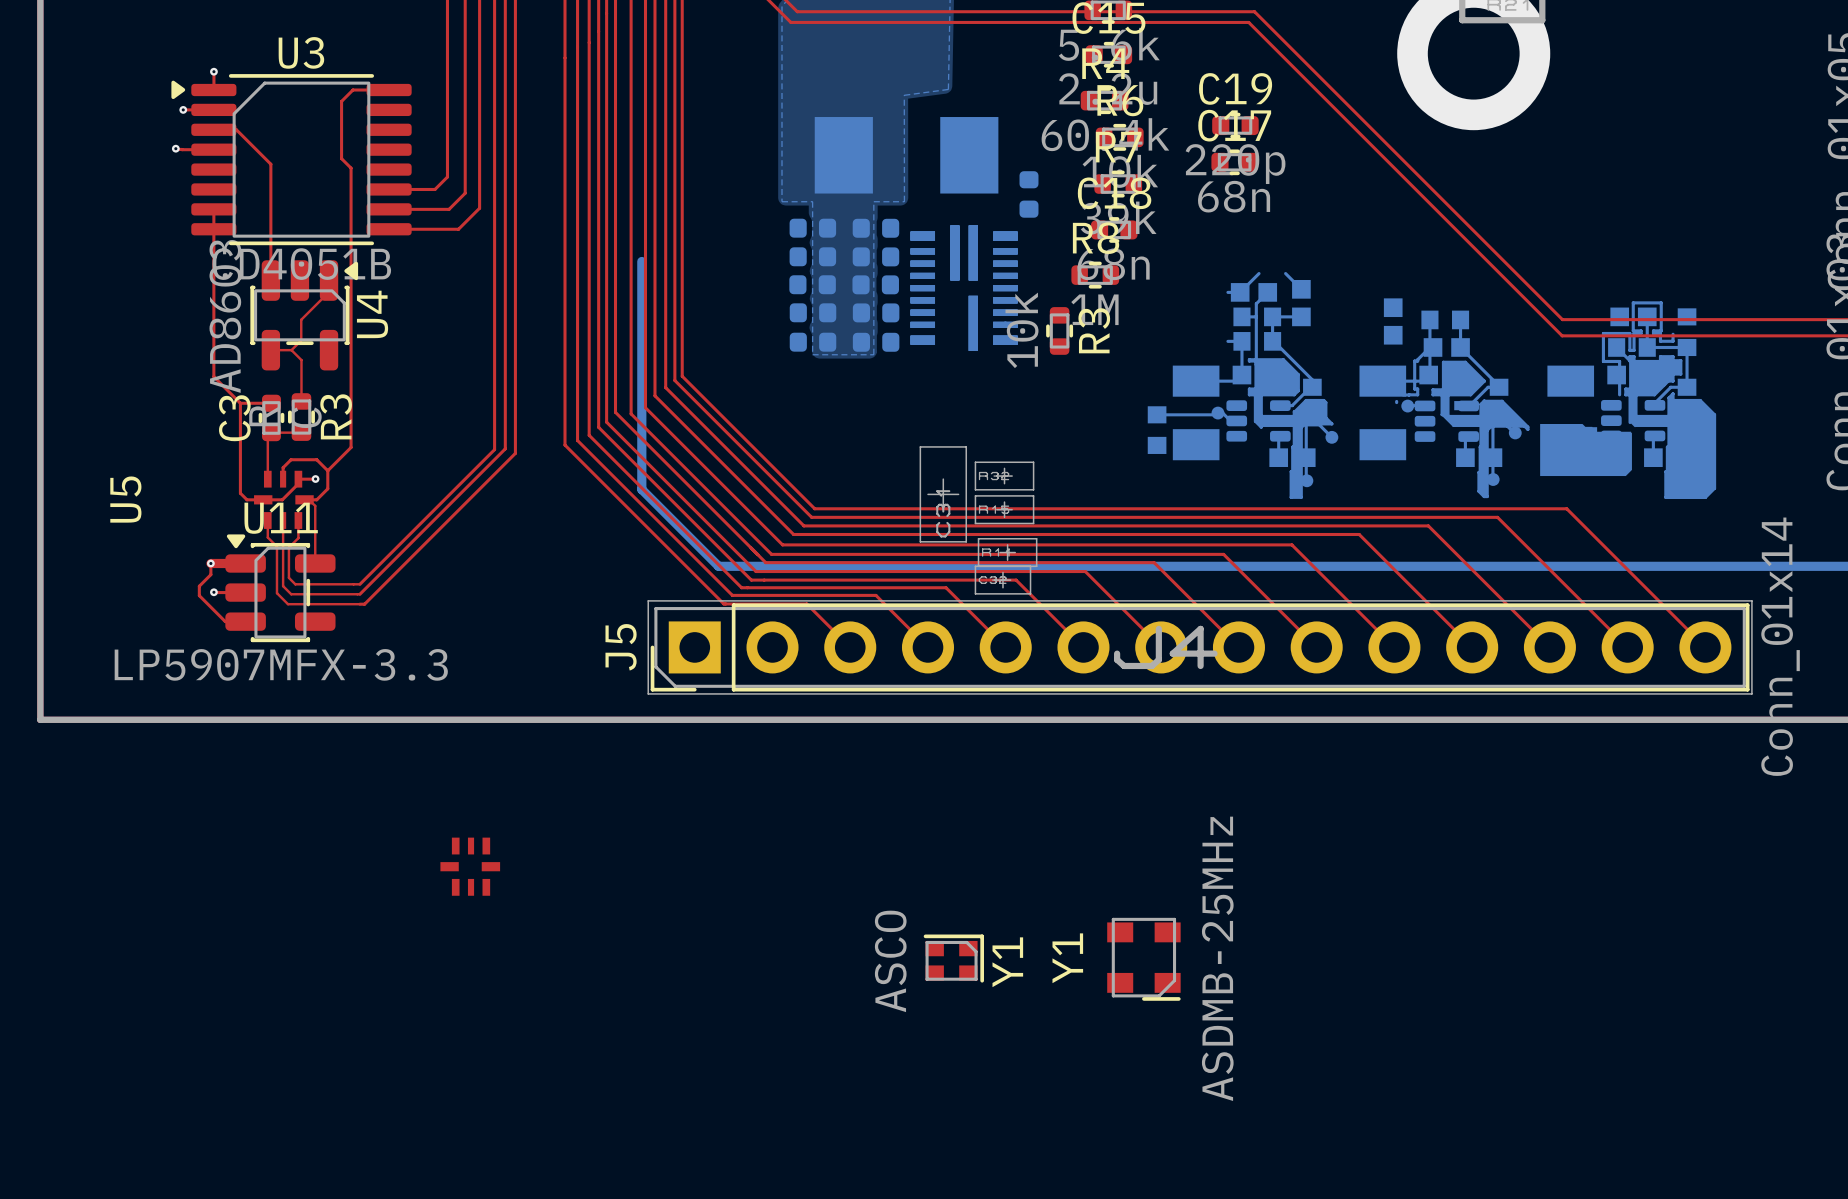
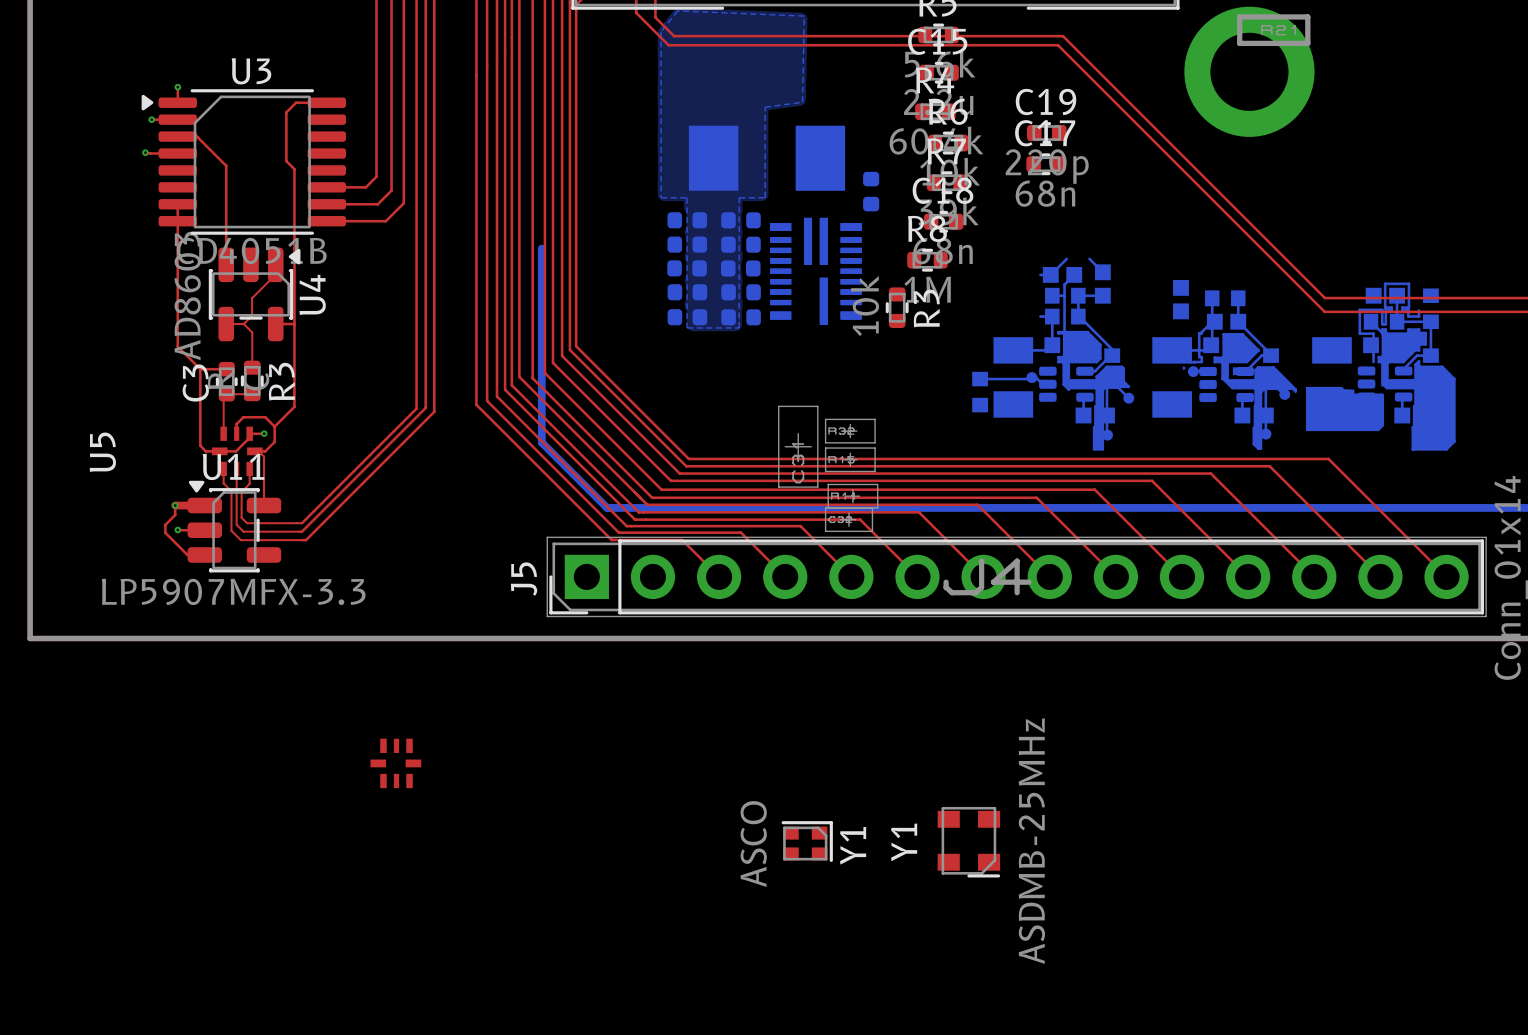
top track: none -> (275, 324) (294, 324)

